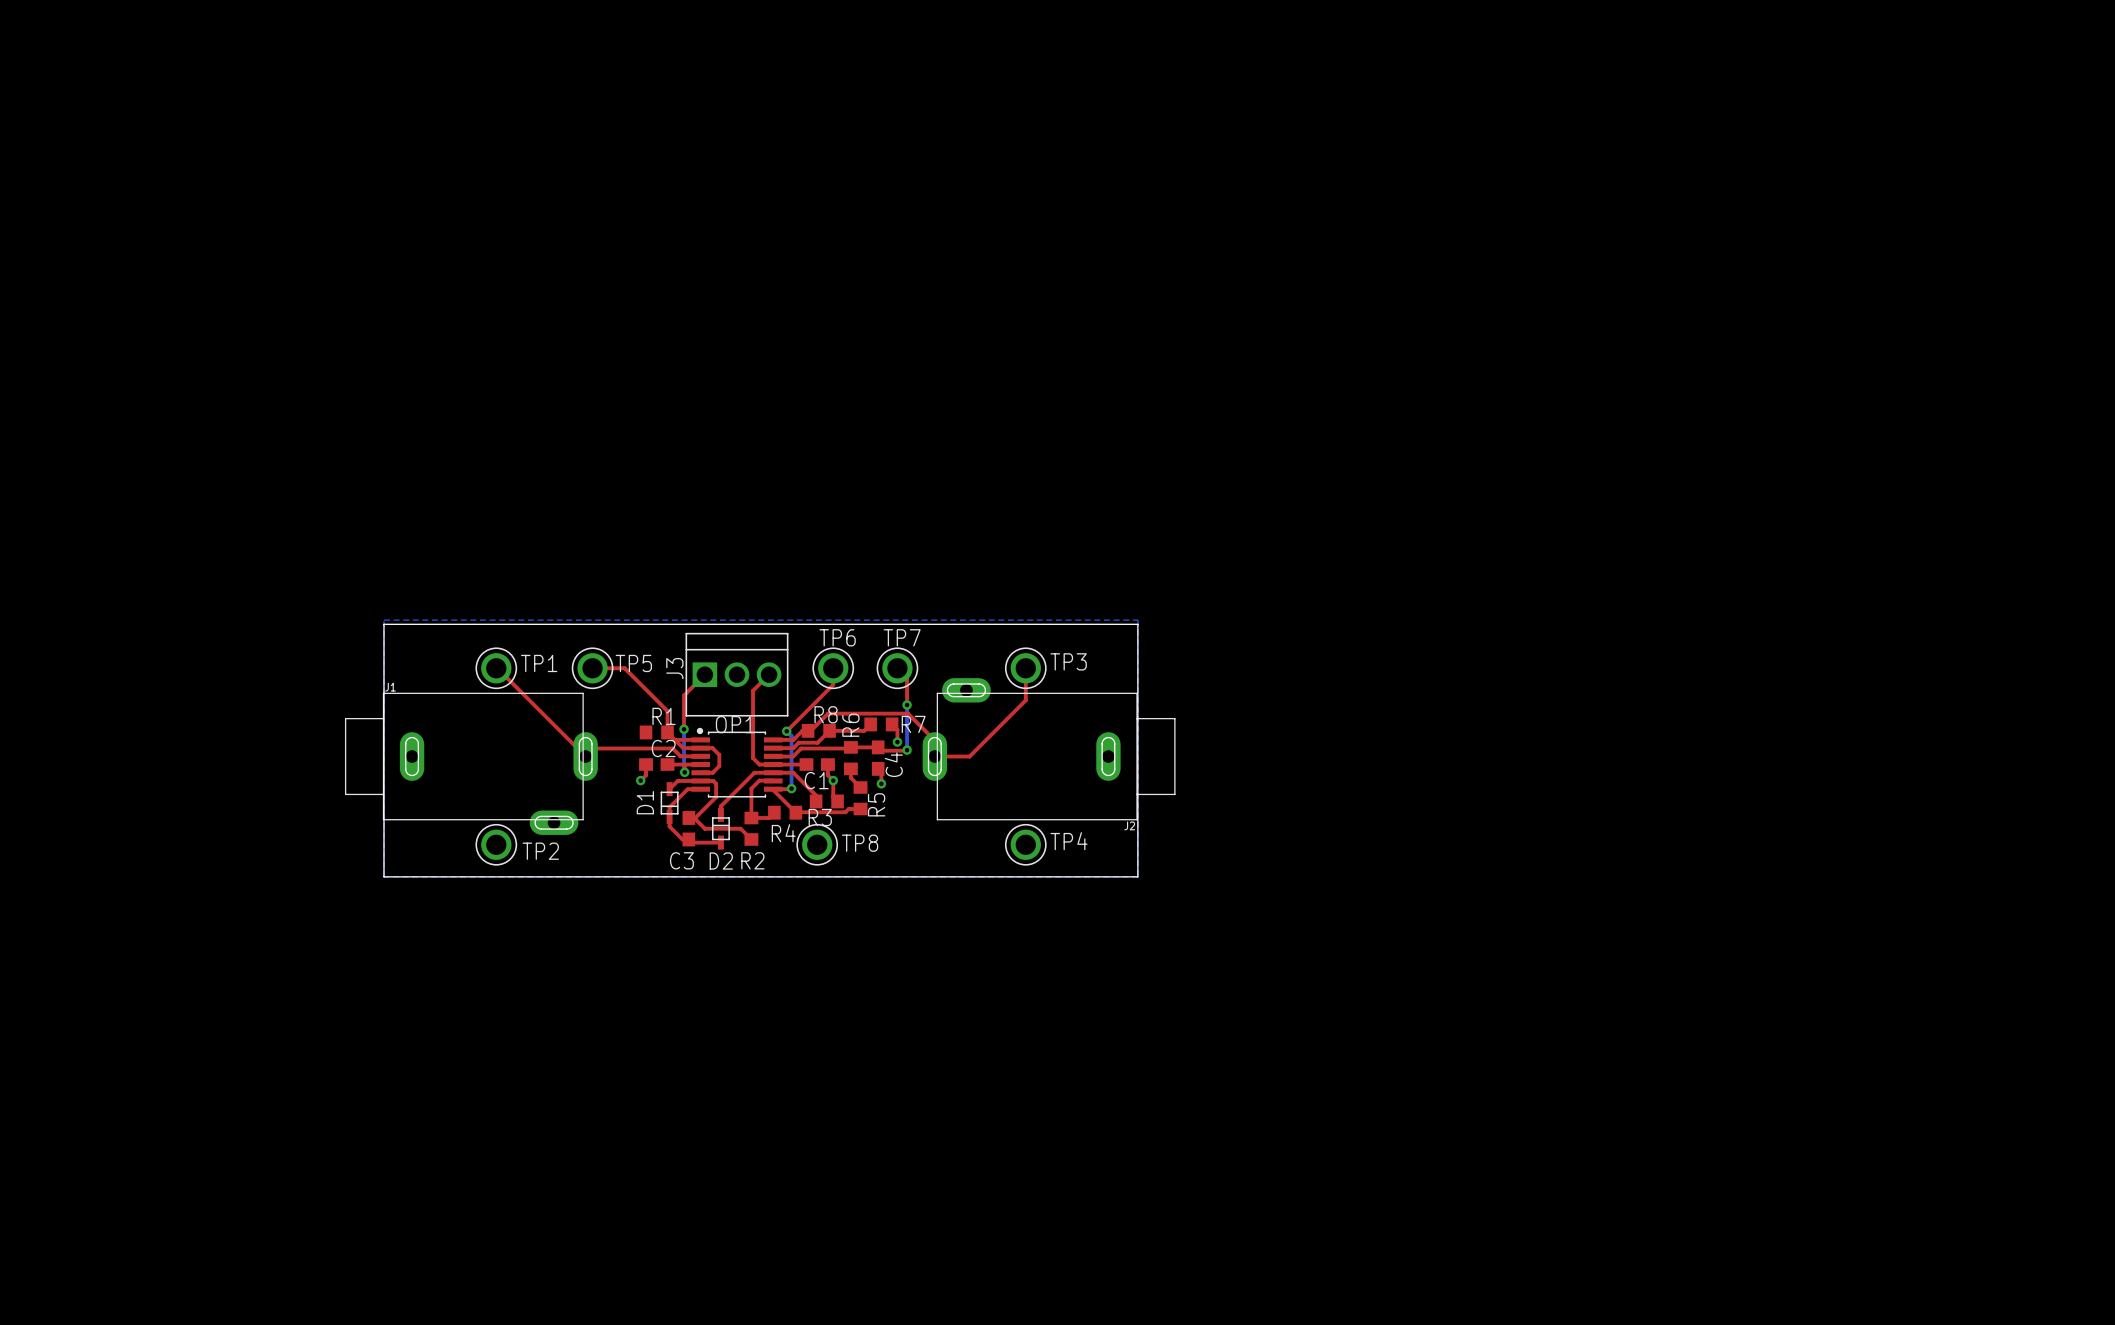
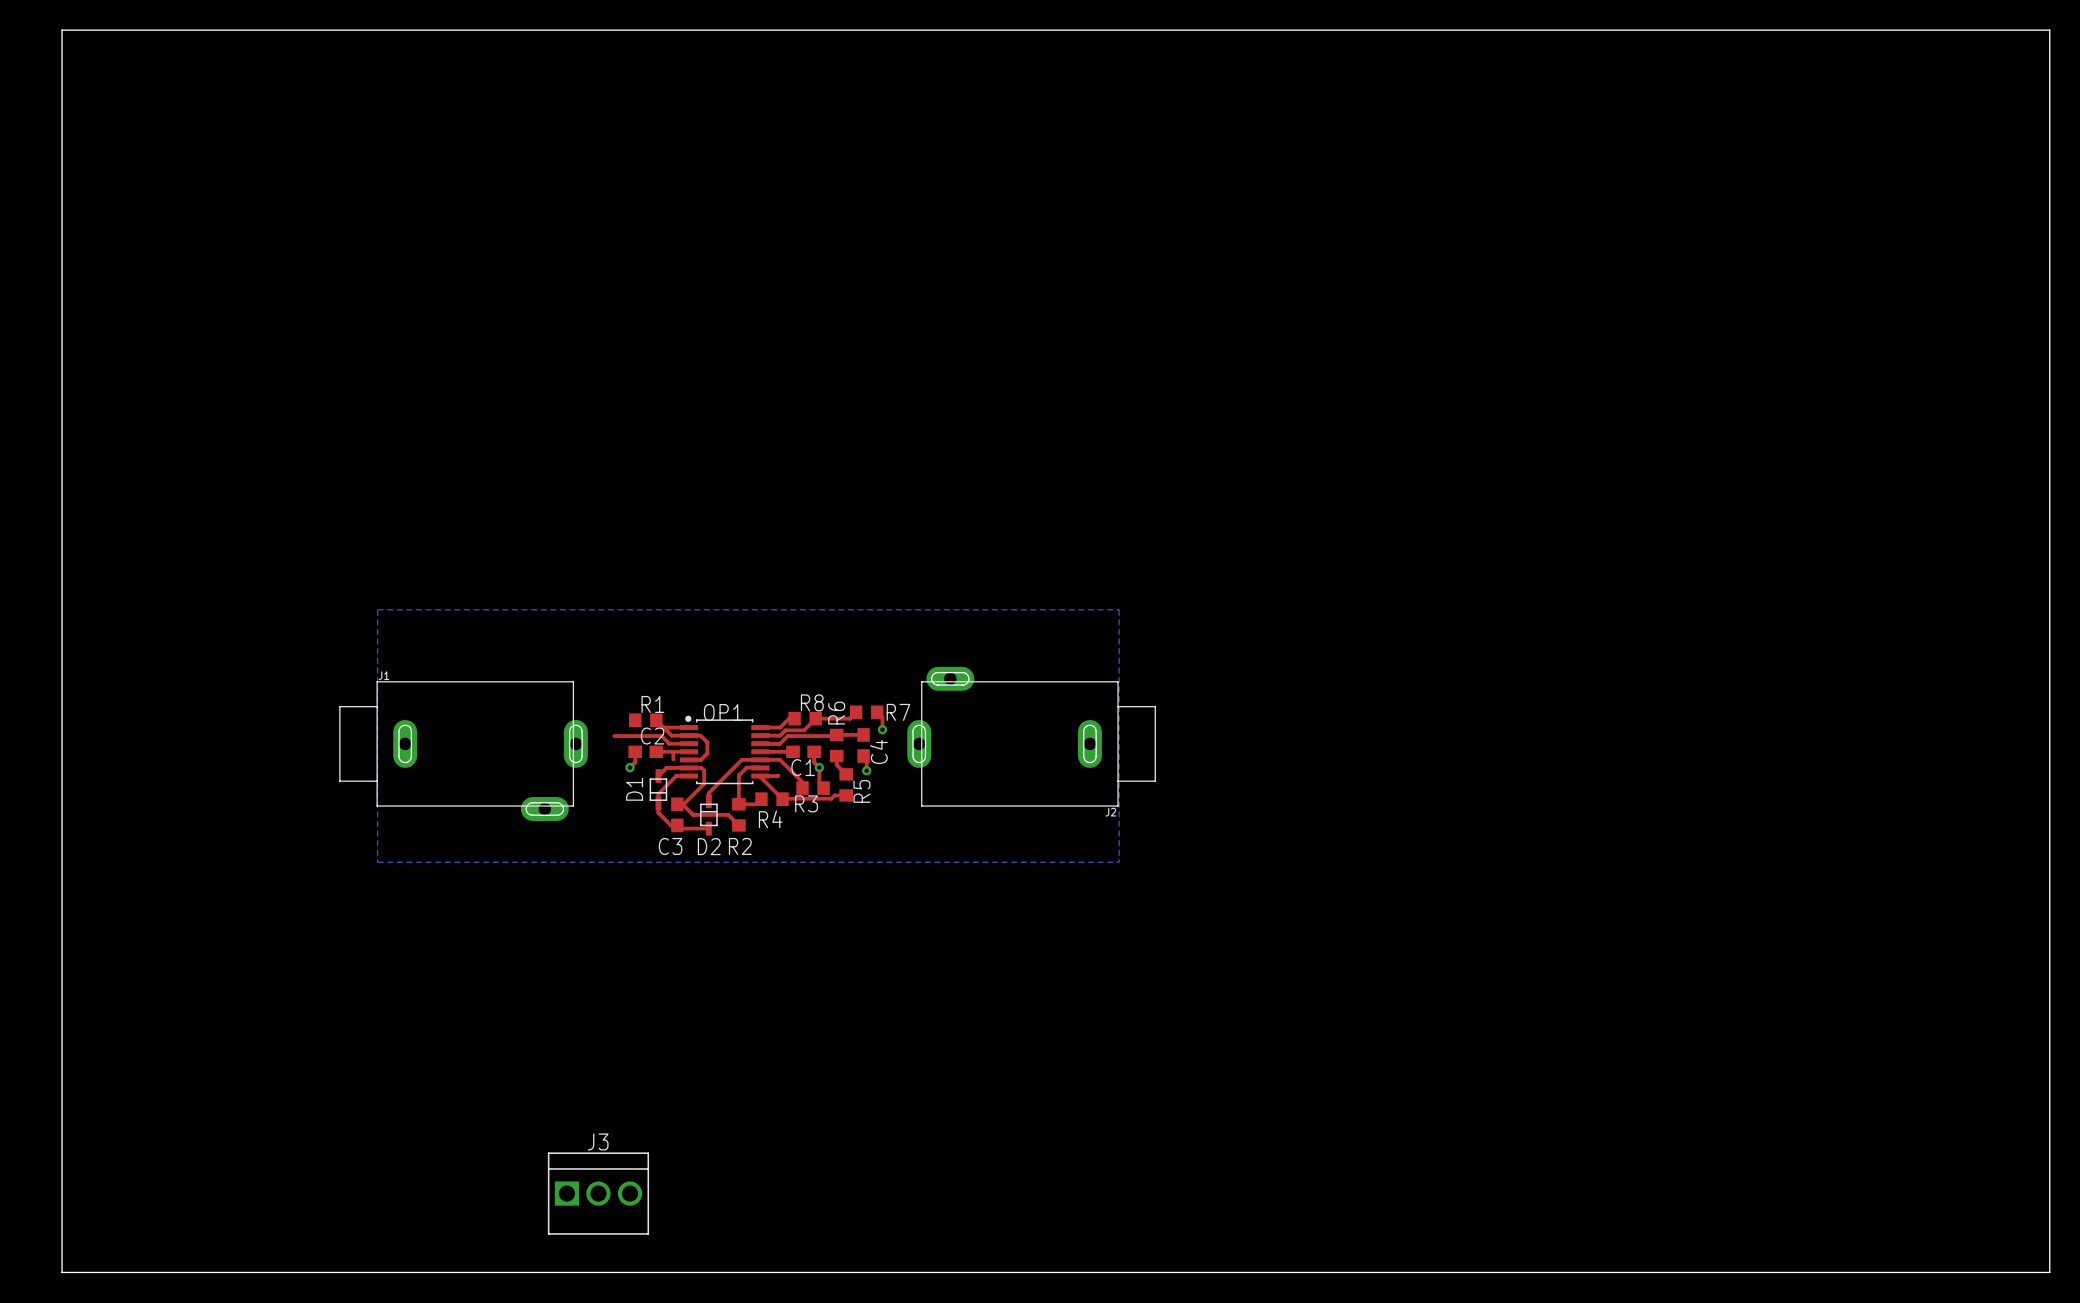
board edge: none -> (62, 30) (2049, 30) (2049, 1272) (62, 1272) (62, 30)
board edge: (383, 624) (1137, 624) (1137, 876) (383, 876) (383, 624) -> none
top track: (496, 668) (585, 756) (593, 748) (624, 748) -> none
TP1: (496, 668) -> none
top track: (592, 668) (624, 668) (667, 711) (667, 732) -> none
TP5: (592, 668) -> none
J3 name rotation: 0° (674, 668) -> 90° clockwise (598, 1141)
J3 name position: J3 (674, 668) -> J3 (598, 1141)
top track: (833, 668) (833, 684) (786, 731) -> none
TP6: (833, 668) -> none
top track: (897, 668) (907, 677) (907, 705) -> none
TP7: (897, 668) -> none
top track: (1025, 668) (1025, 700) (969, 756) (934, 756) (934, 740) (908, 713) (828, 713) (810, 730) (808, 730) -> none
TP3: (1025, 668) -> none
top track: (704, 674) (684, 695) (684, 729) -> none
J3 position: (736, 674) -> (598, 1193)
top track: (769, 674) (753, 690) (753, 758) (759, 764) (773, 764) -> none
bottom track: (907, 705) (907, 750) -> none
via: (907, 705) -> none
bottom track: (684, 729) (684, 772) -> none
via: (684, 729) -> none
bottom track: (786, 731) (791, 736) (791, 788) -> none
via: (786, 731) -> none
top track: (878, 747) (881, 750) (907, 750) -> none
via: (907, 750) -> none
via: (684, 772) -> none
via: (791, 788) -> none
TP2: (496, 844) -> none
TP8: (817, 844) -> none
TP4: (1025, 844) -> none

